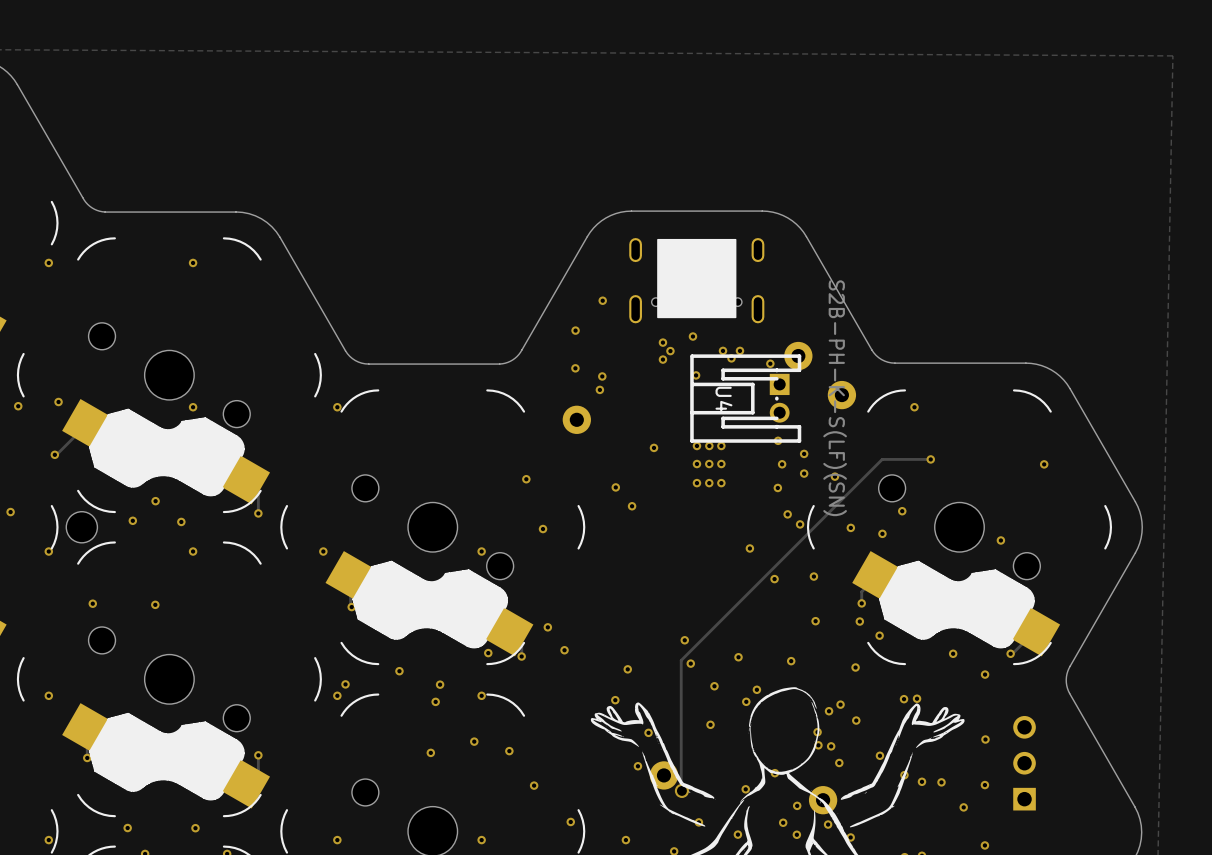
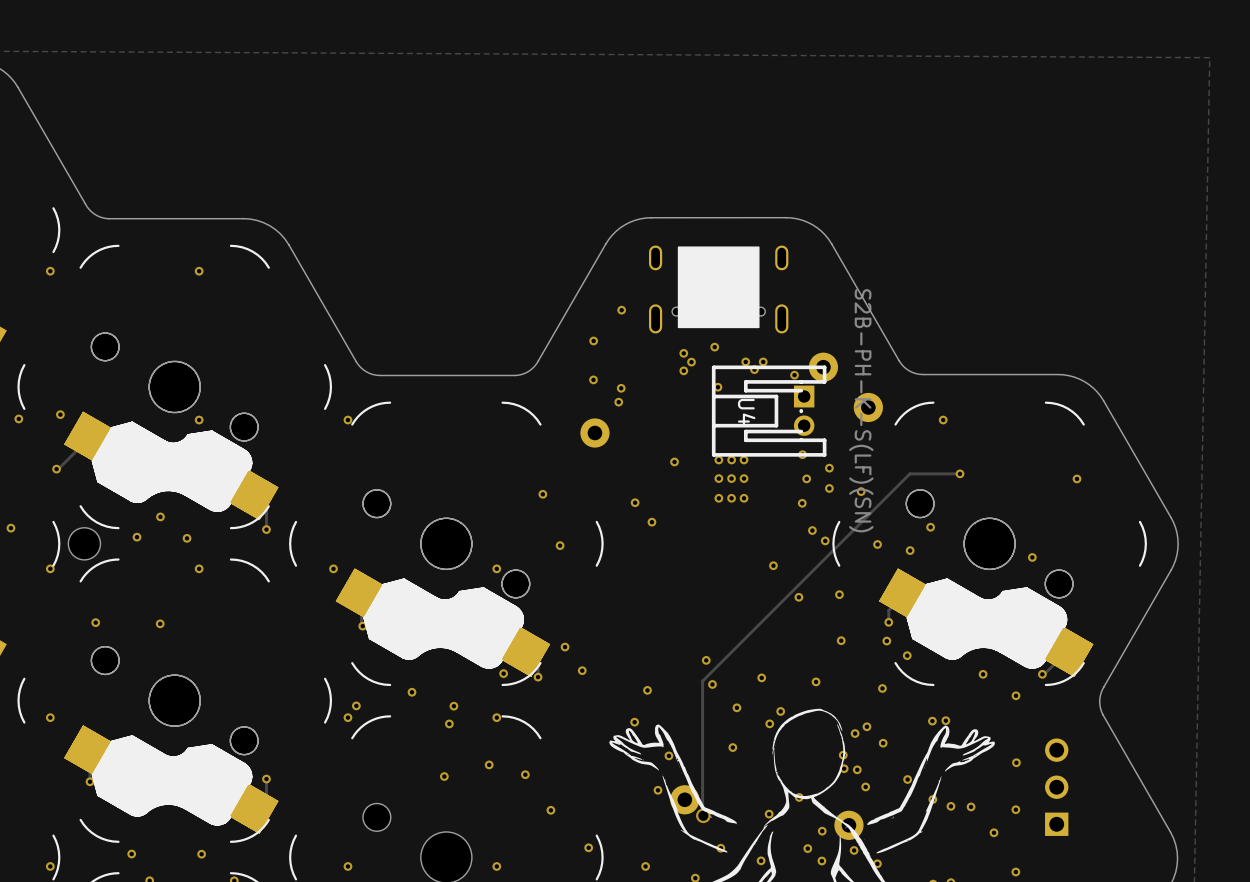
part: none -> (171, 426)
part: none -> (442, 583)
part: none -> (986, 583)
part: none -> (171, 740)

